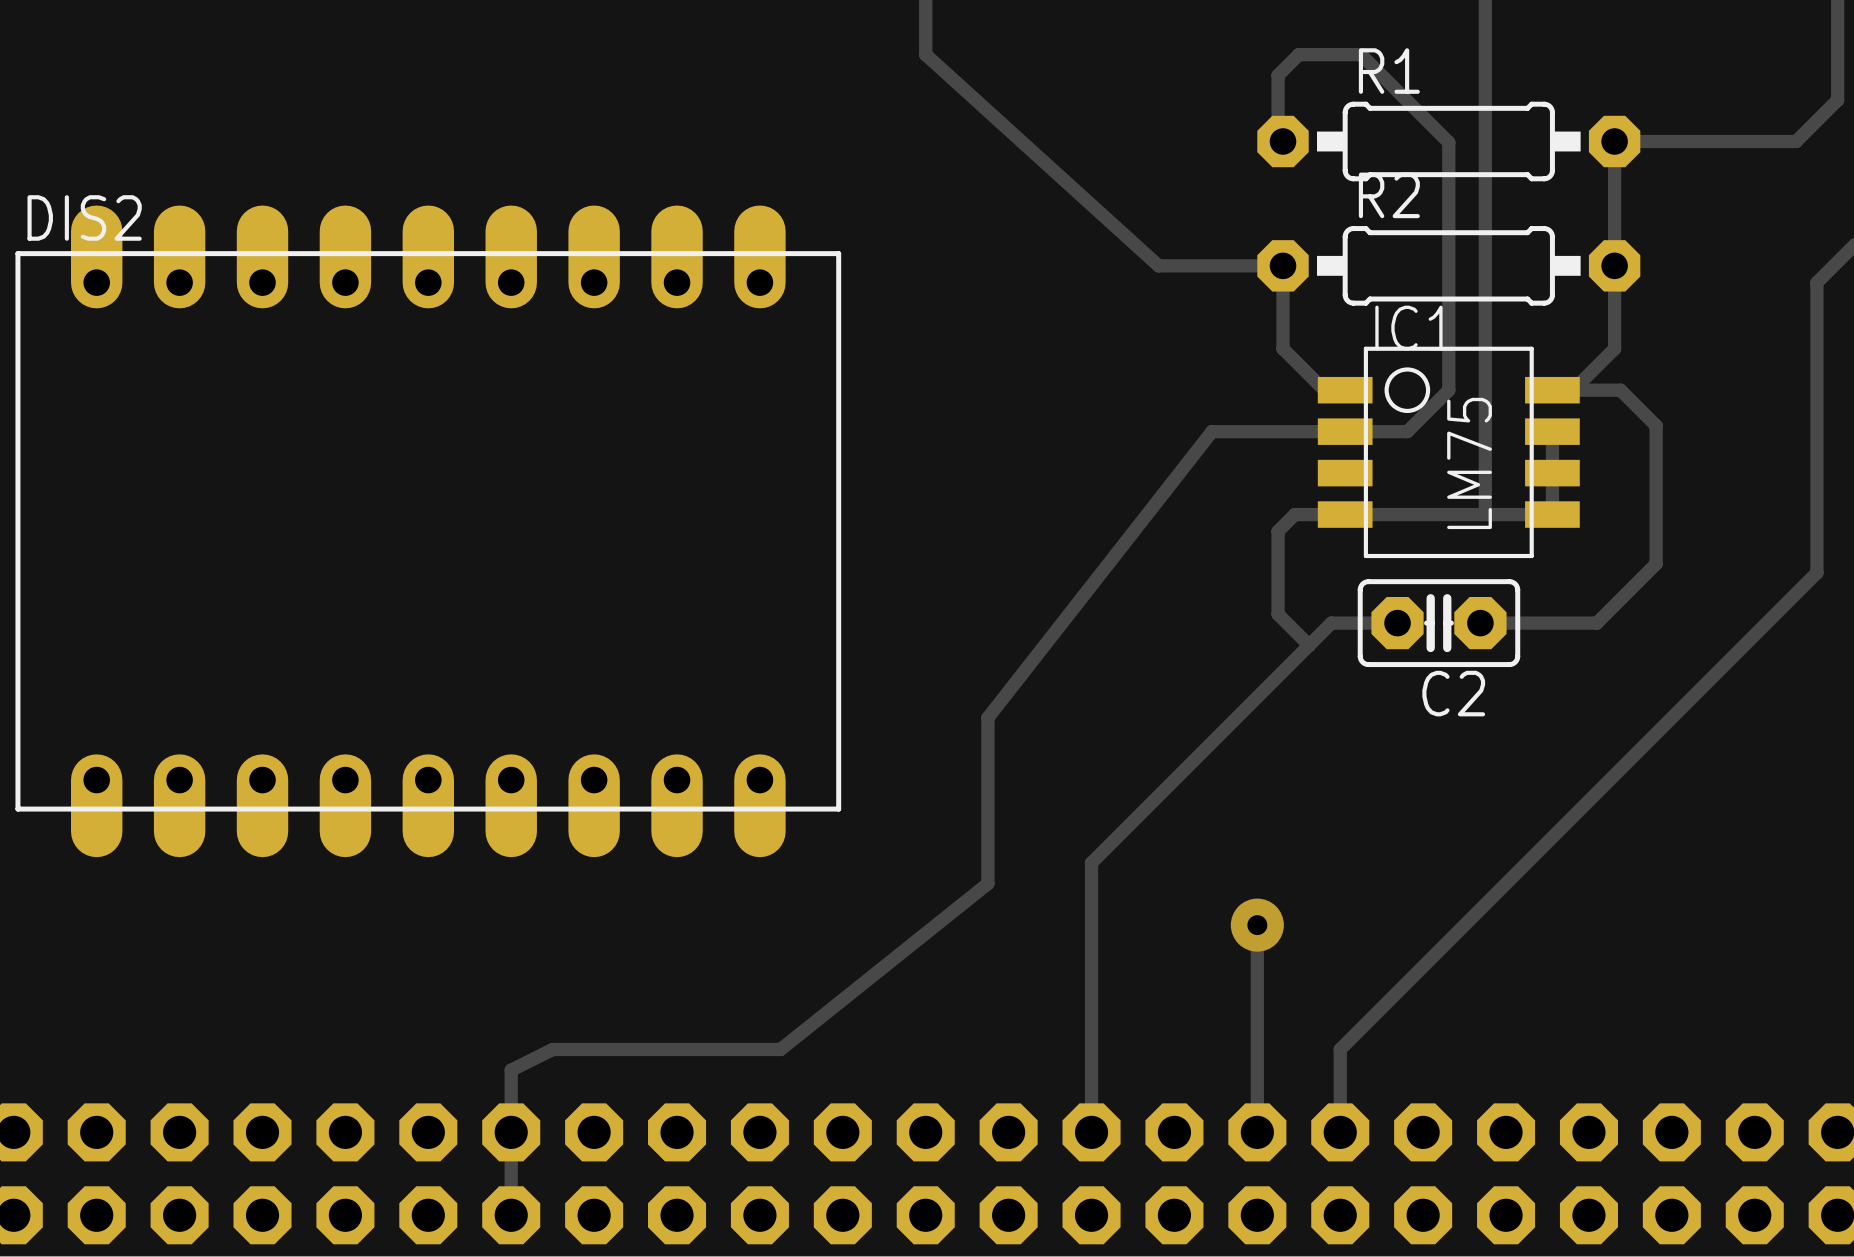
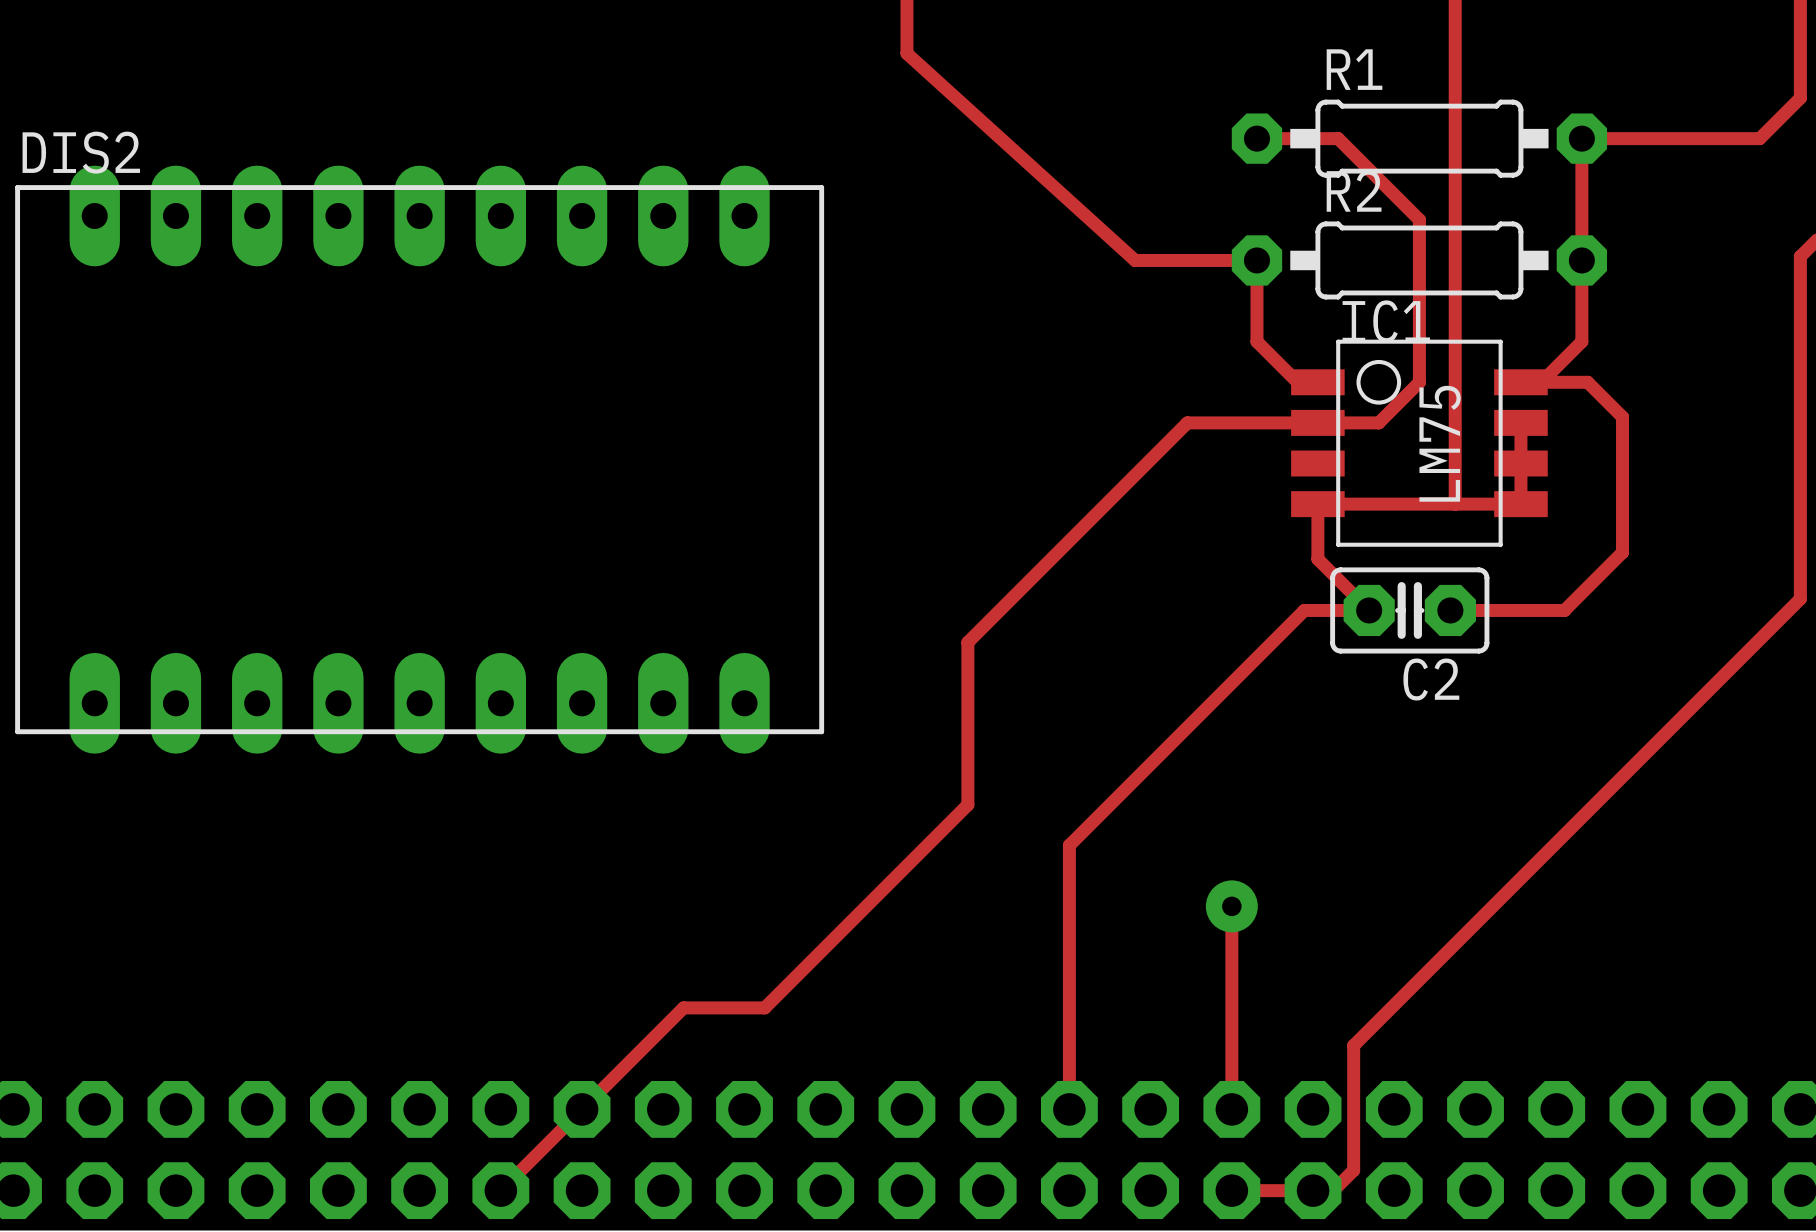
track: (1283, 141) (1278, 136) (1278, 75) (1298, 54) (1360, 54) (1448, 142) (1448, 224) -> (1256, 138) (1338, 138) (1419, 219)
DIS2 footprint: [15, 205, 842, 858] -> [15, 165, 825, 754]
track: (1837, 261) (1816, 282) (1816, 572) (1340, 1049) (1340, 1132) -> (1800, 256) (1800, 598) (1353, 1045) (1353, 1170) (1333, 1190) (1231, 1190)
track: (1211, 431) (987, 717) -> (1187, 422) (967, 642) (967, 703)
track: (1345, 514) (1294, 514) (1278, 531) (1278, 614) (1309, 645) -> (1317, 504) (1317, 559) (1369, 610)
track: (987, 821) (987, 883) (780, 1049) (552, 1049) (511, 1070) (511, 1215) -> (967, 804) (764, 1007) (683, 1007) (500, 1190)

